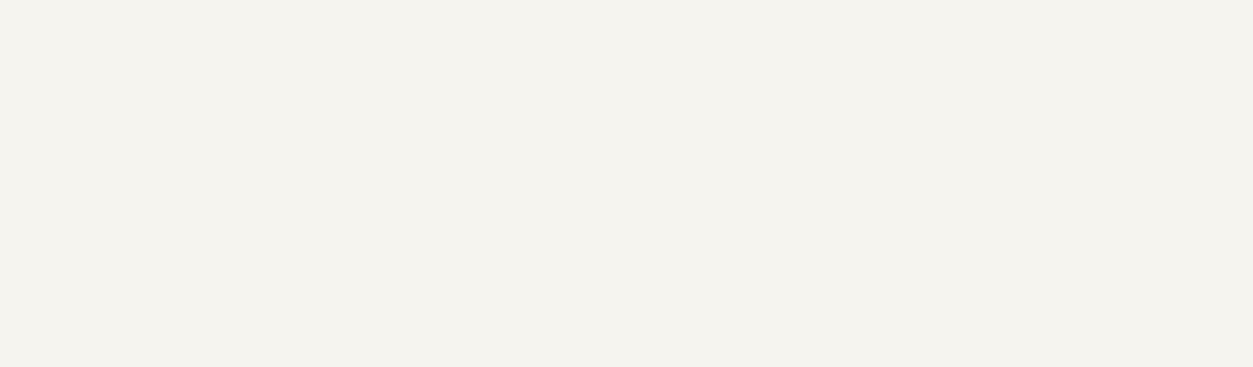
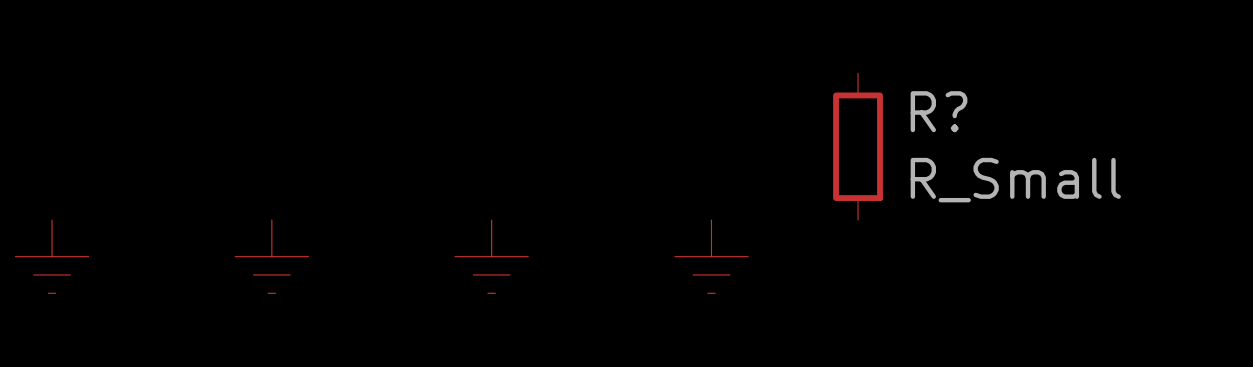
R?: none -> R_Small (858, 146)
power symbol: none -> (52, 256)
power symbol: none -> (271, 256)
power symbol: none -> (491, 256)
power symbol: none -> (711, 256)

